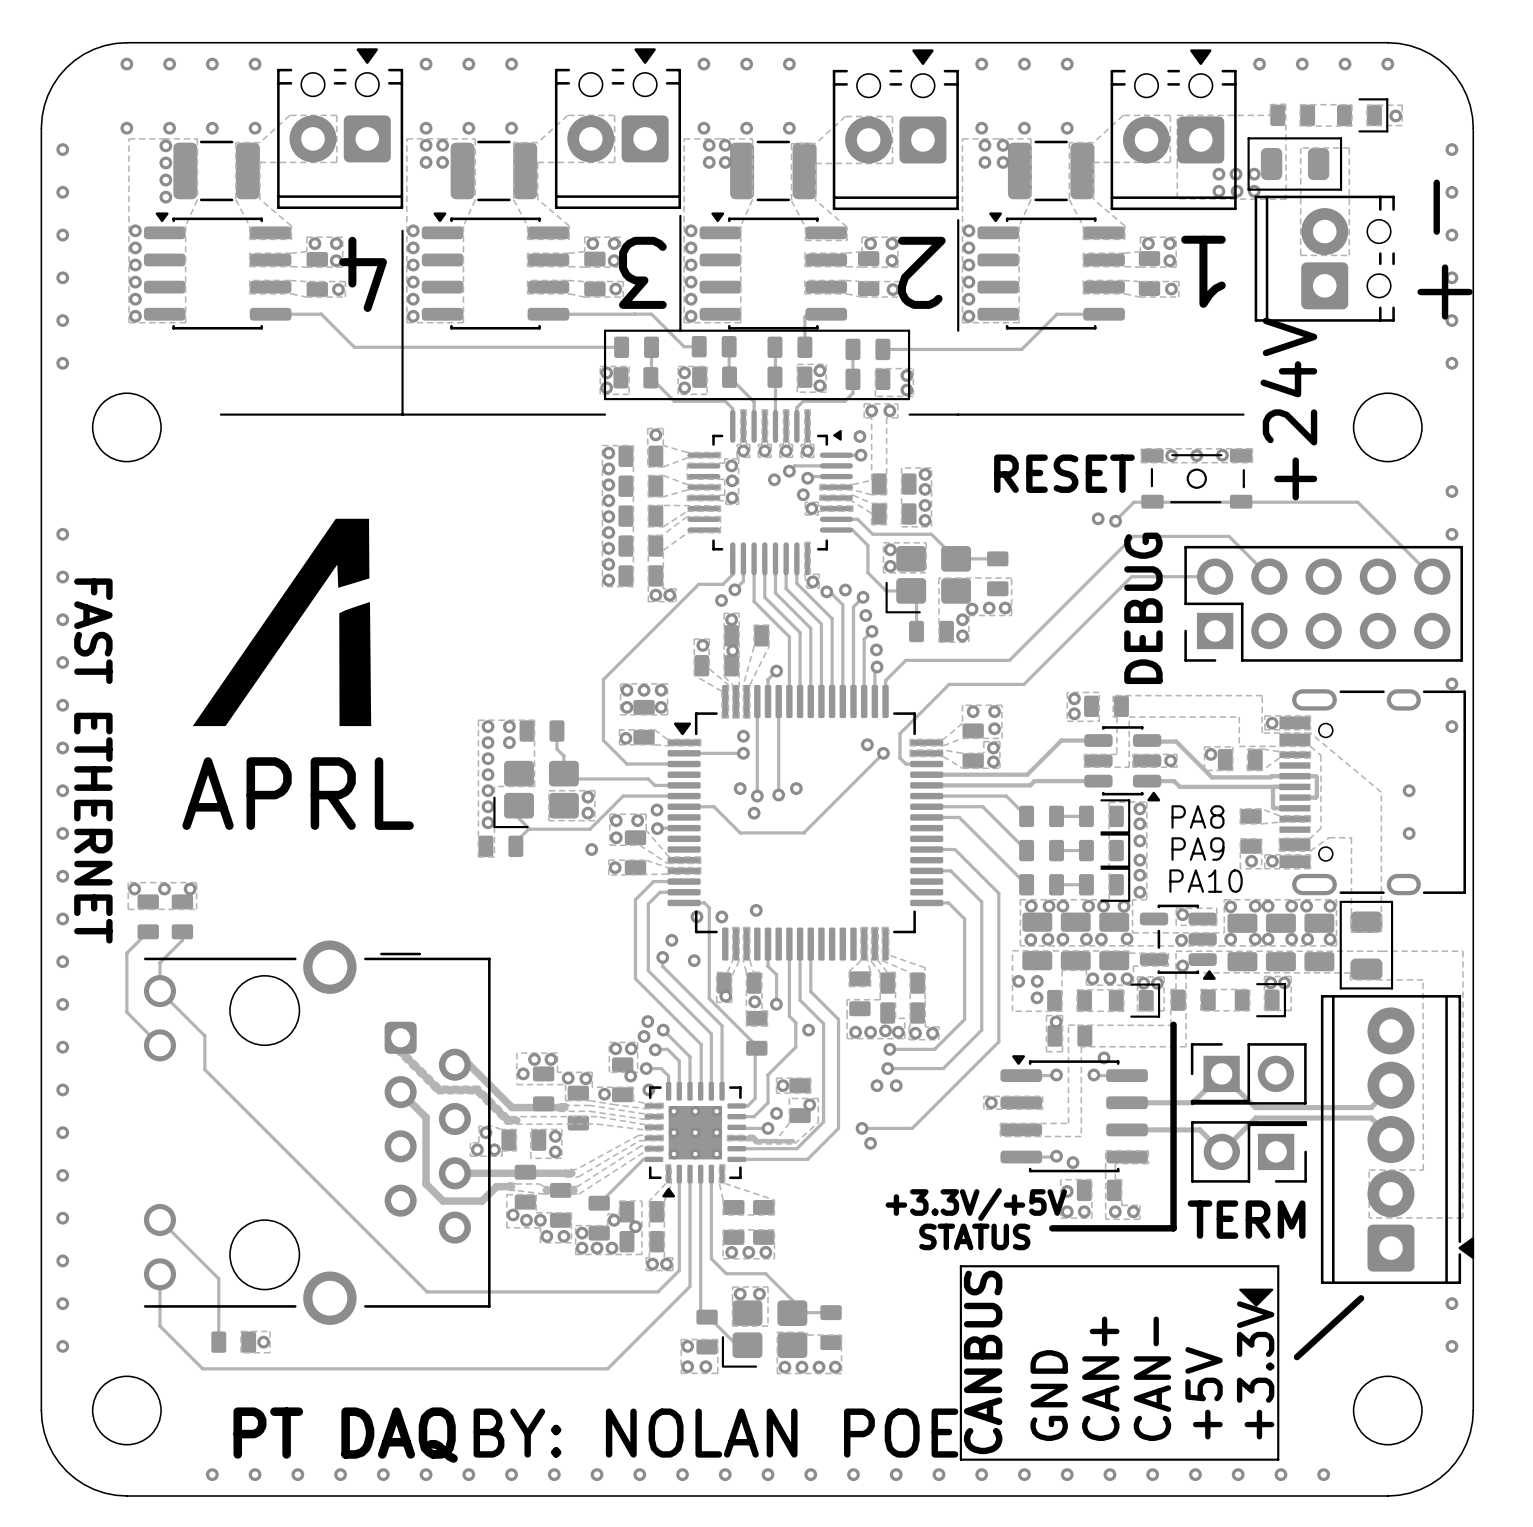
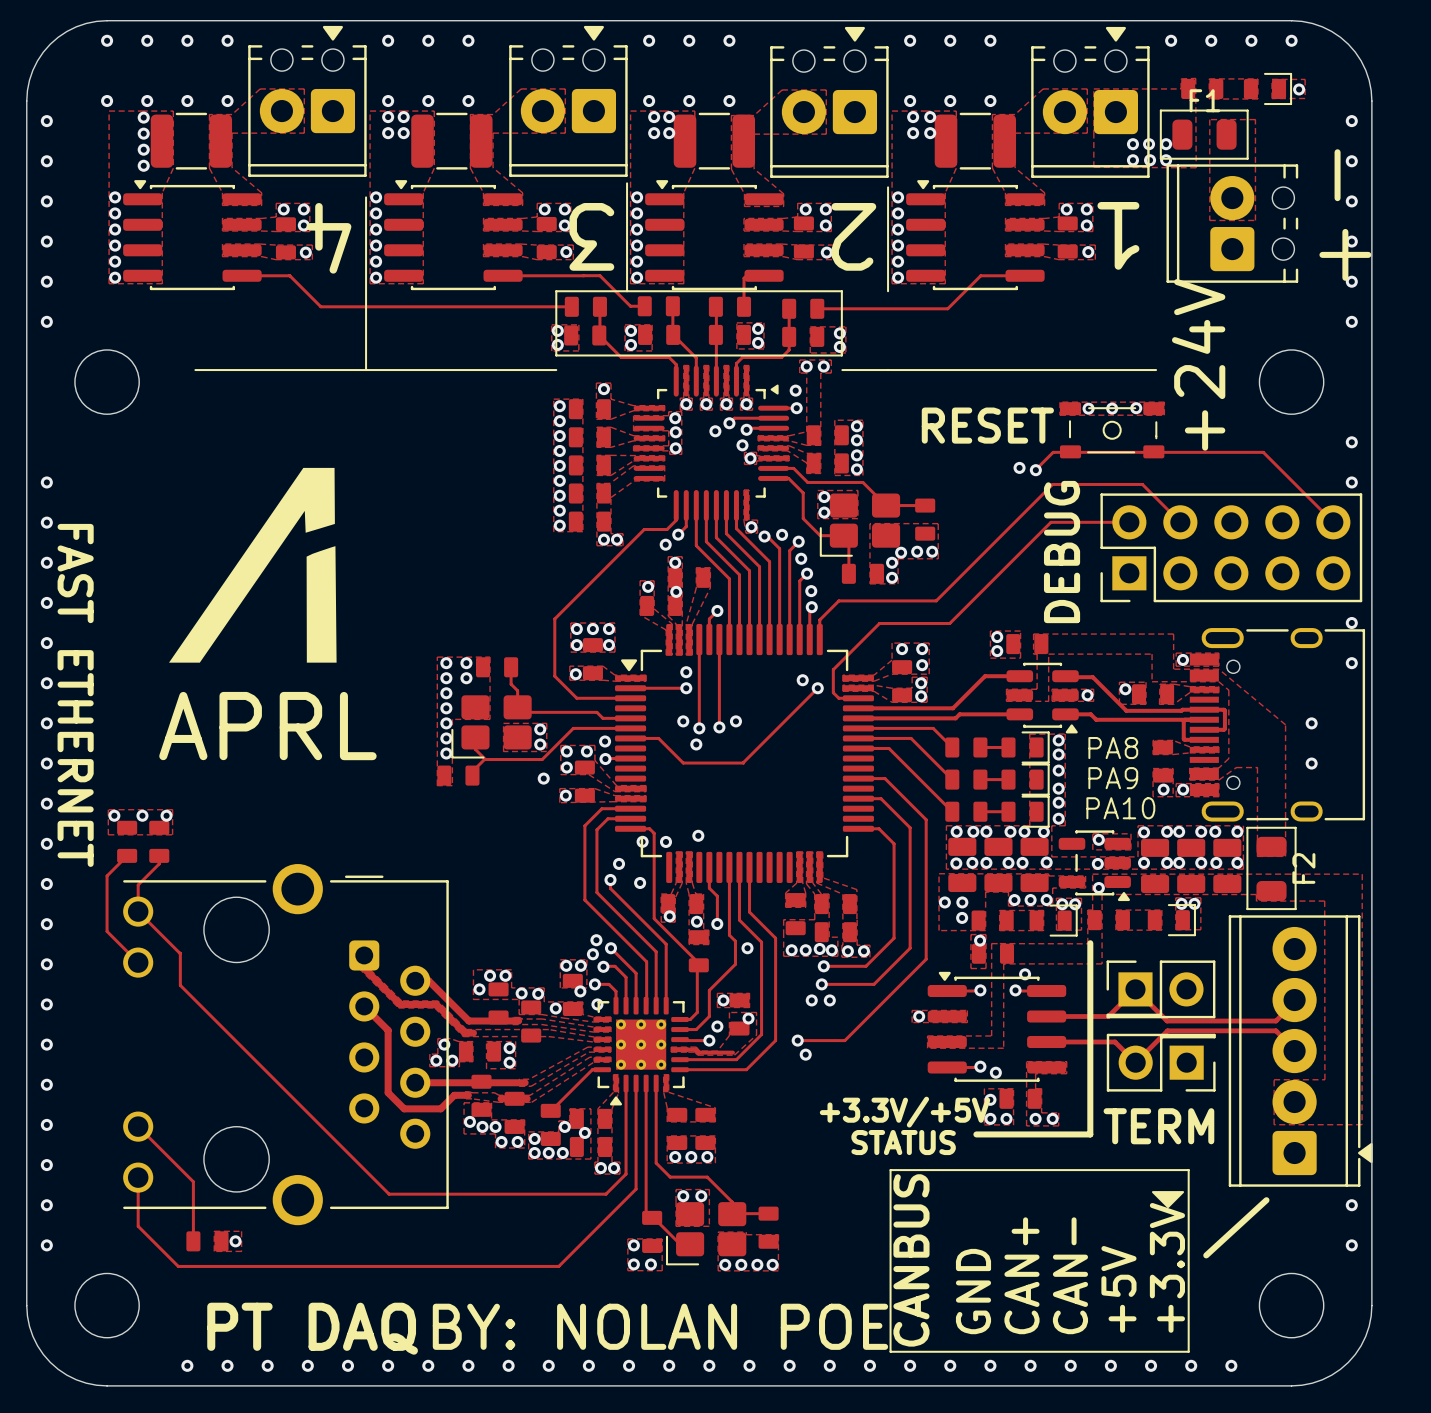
F1 name: none -> F1 (1204, 100)
F2 name: none -> F2 (1303, 868)

